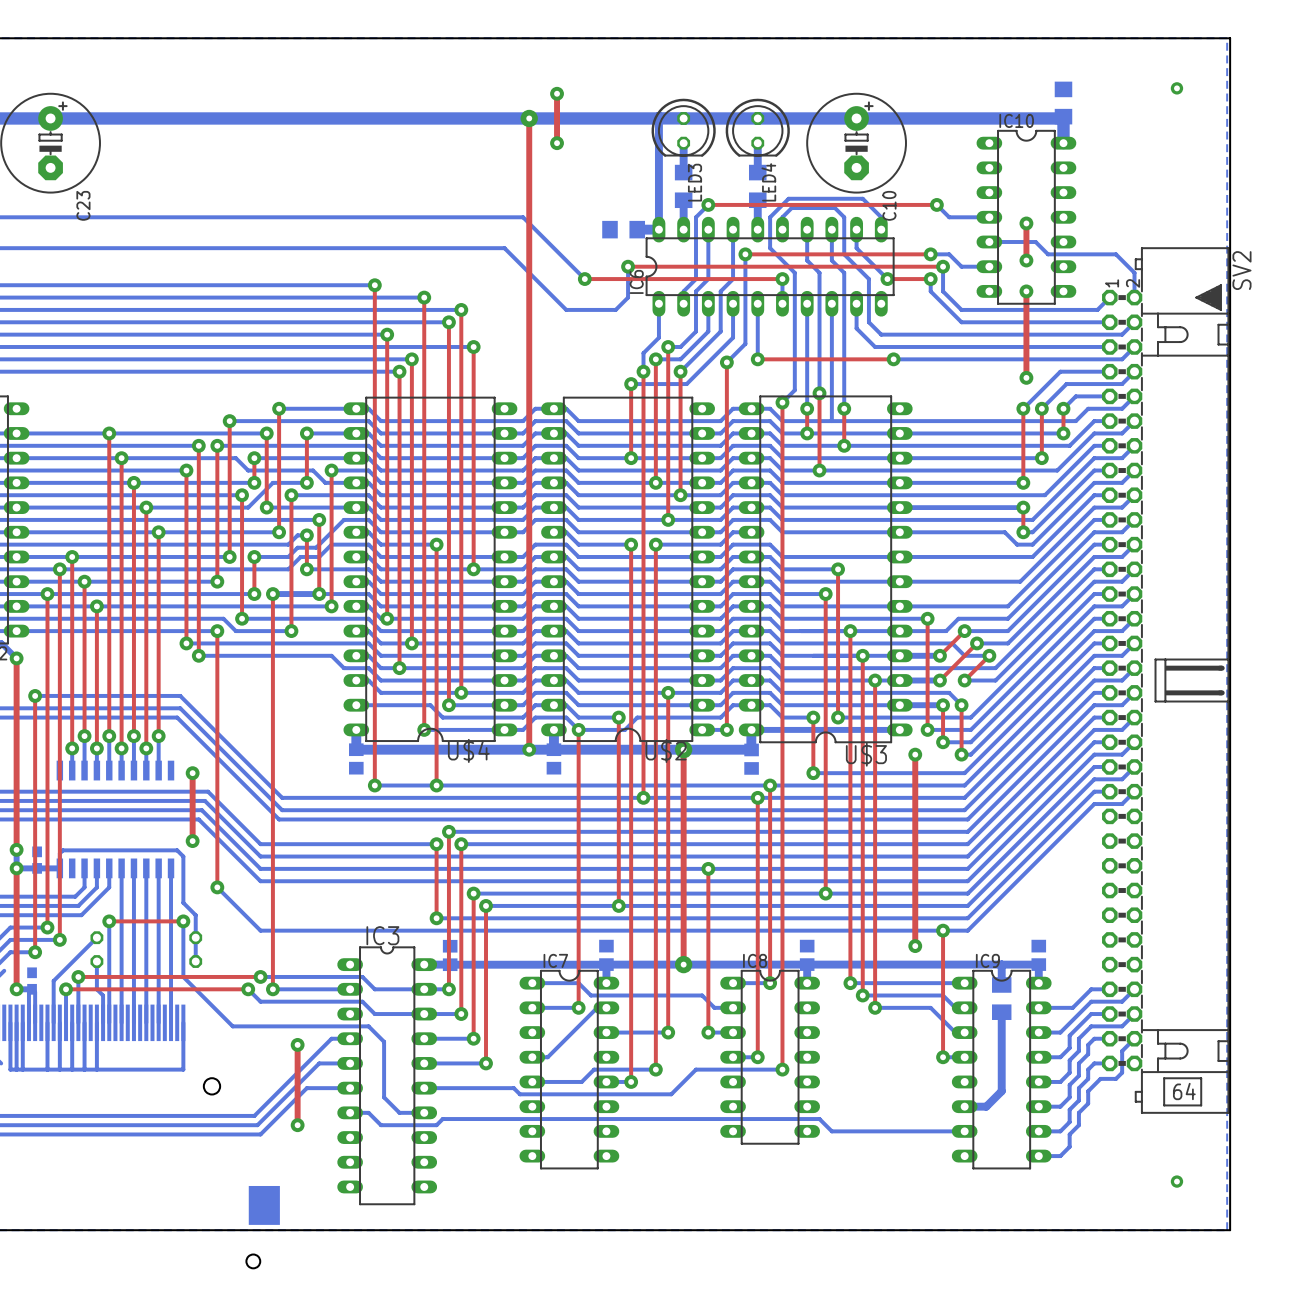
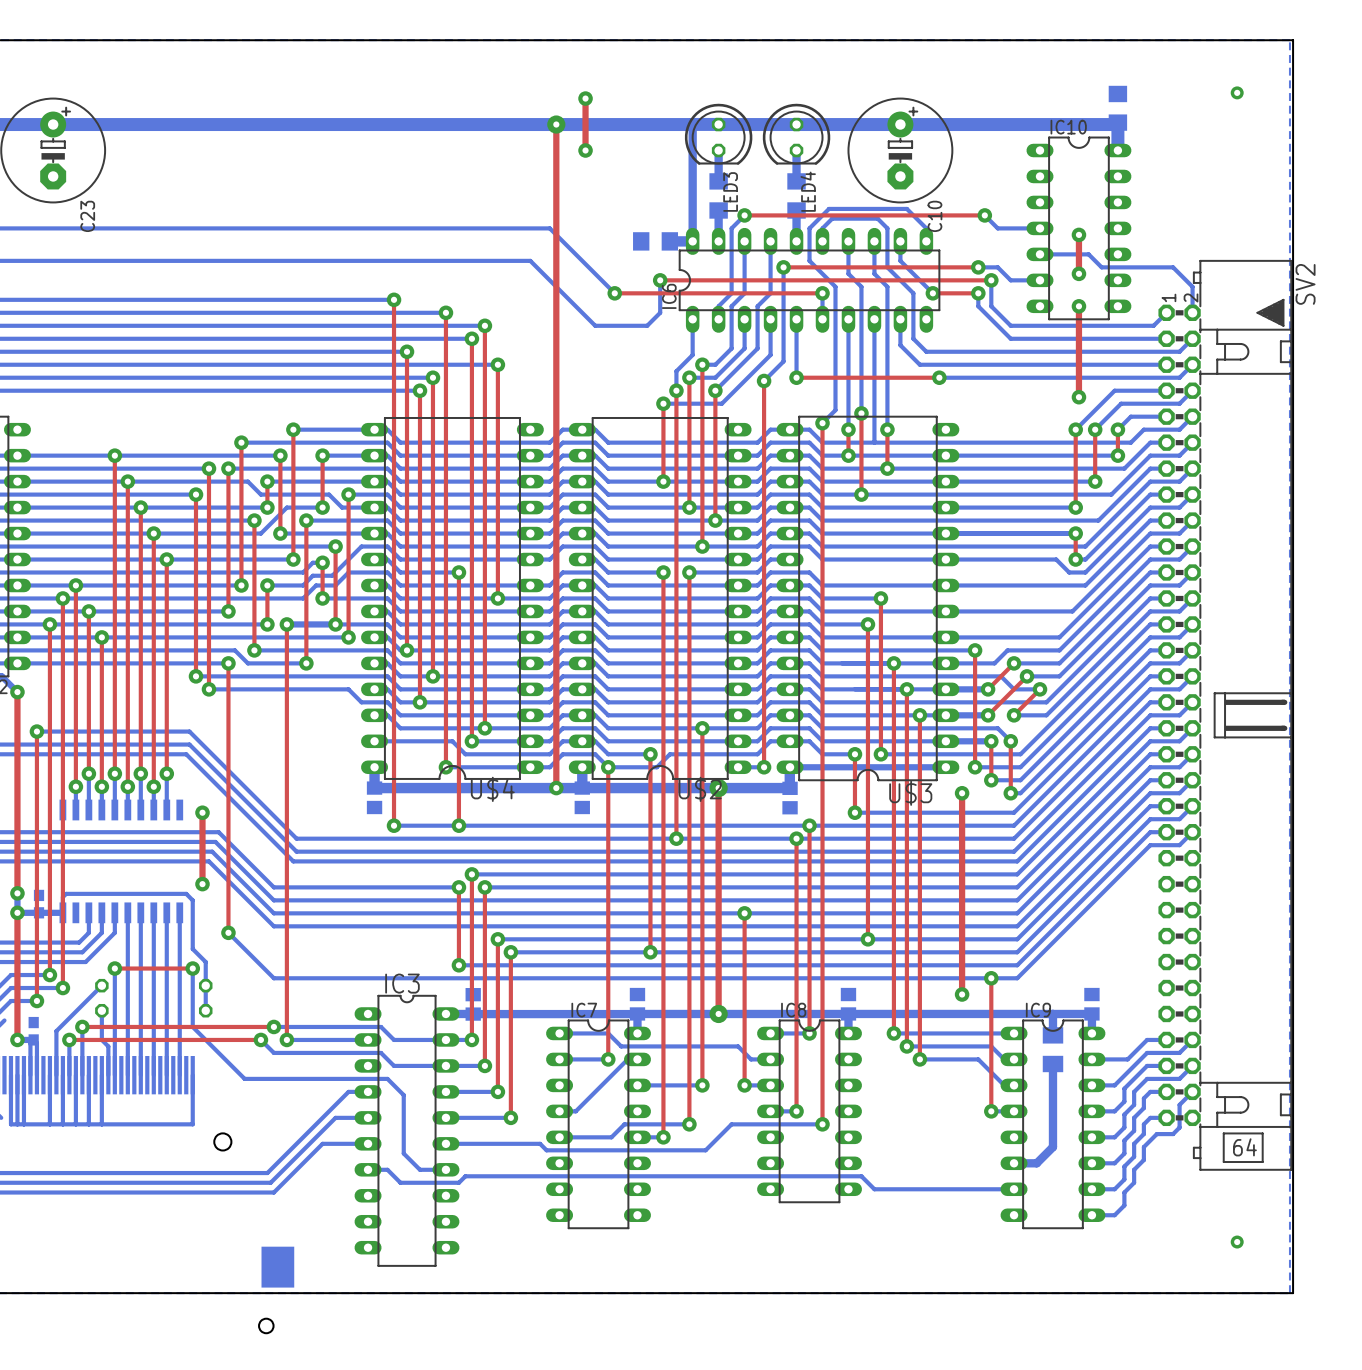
top track: (297, 1044) (297, 1125) -> none
via: (297, 1044) -> none
via: (297, 1125) -> none

